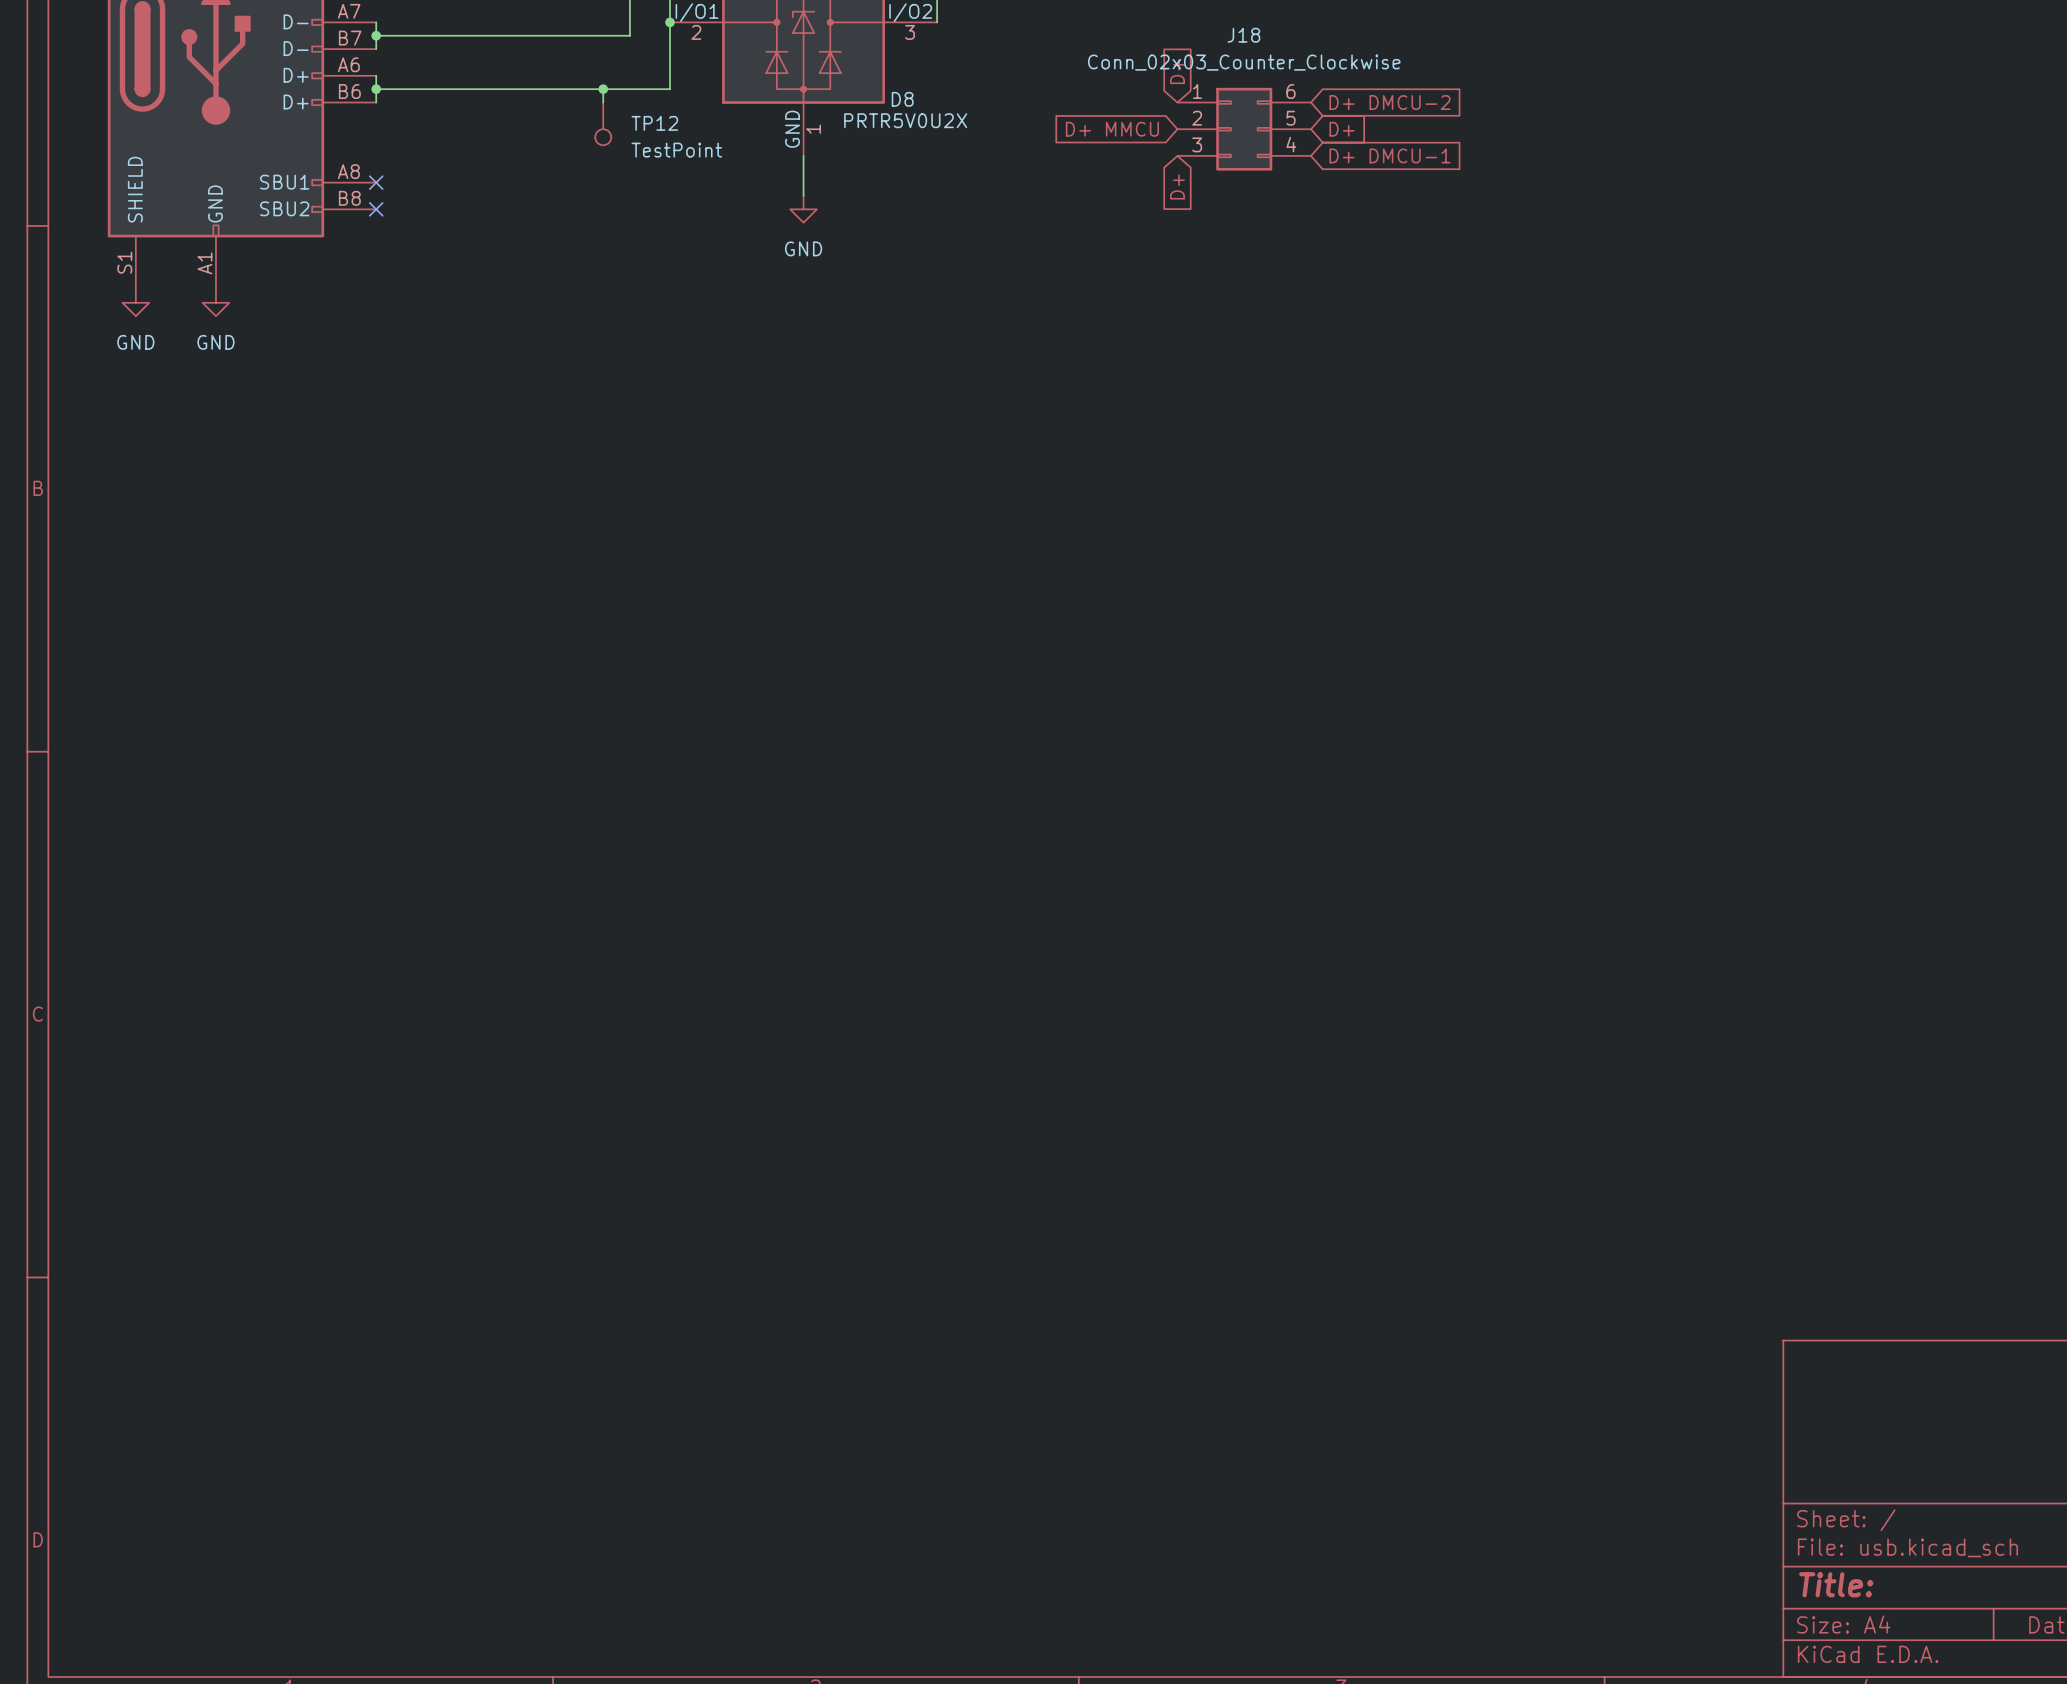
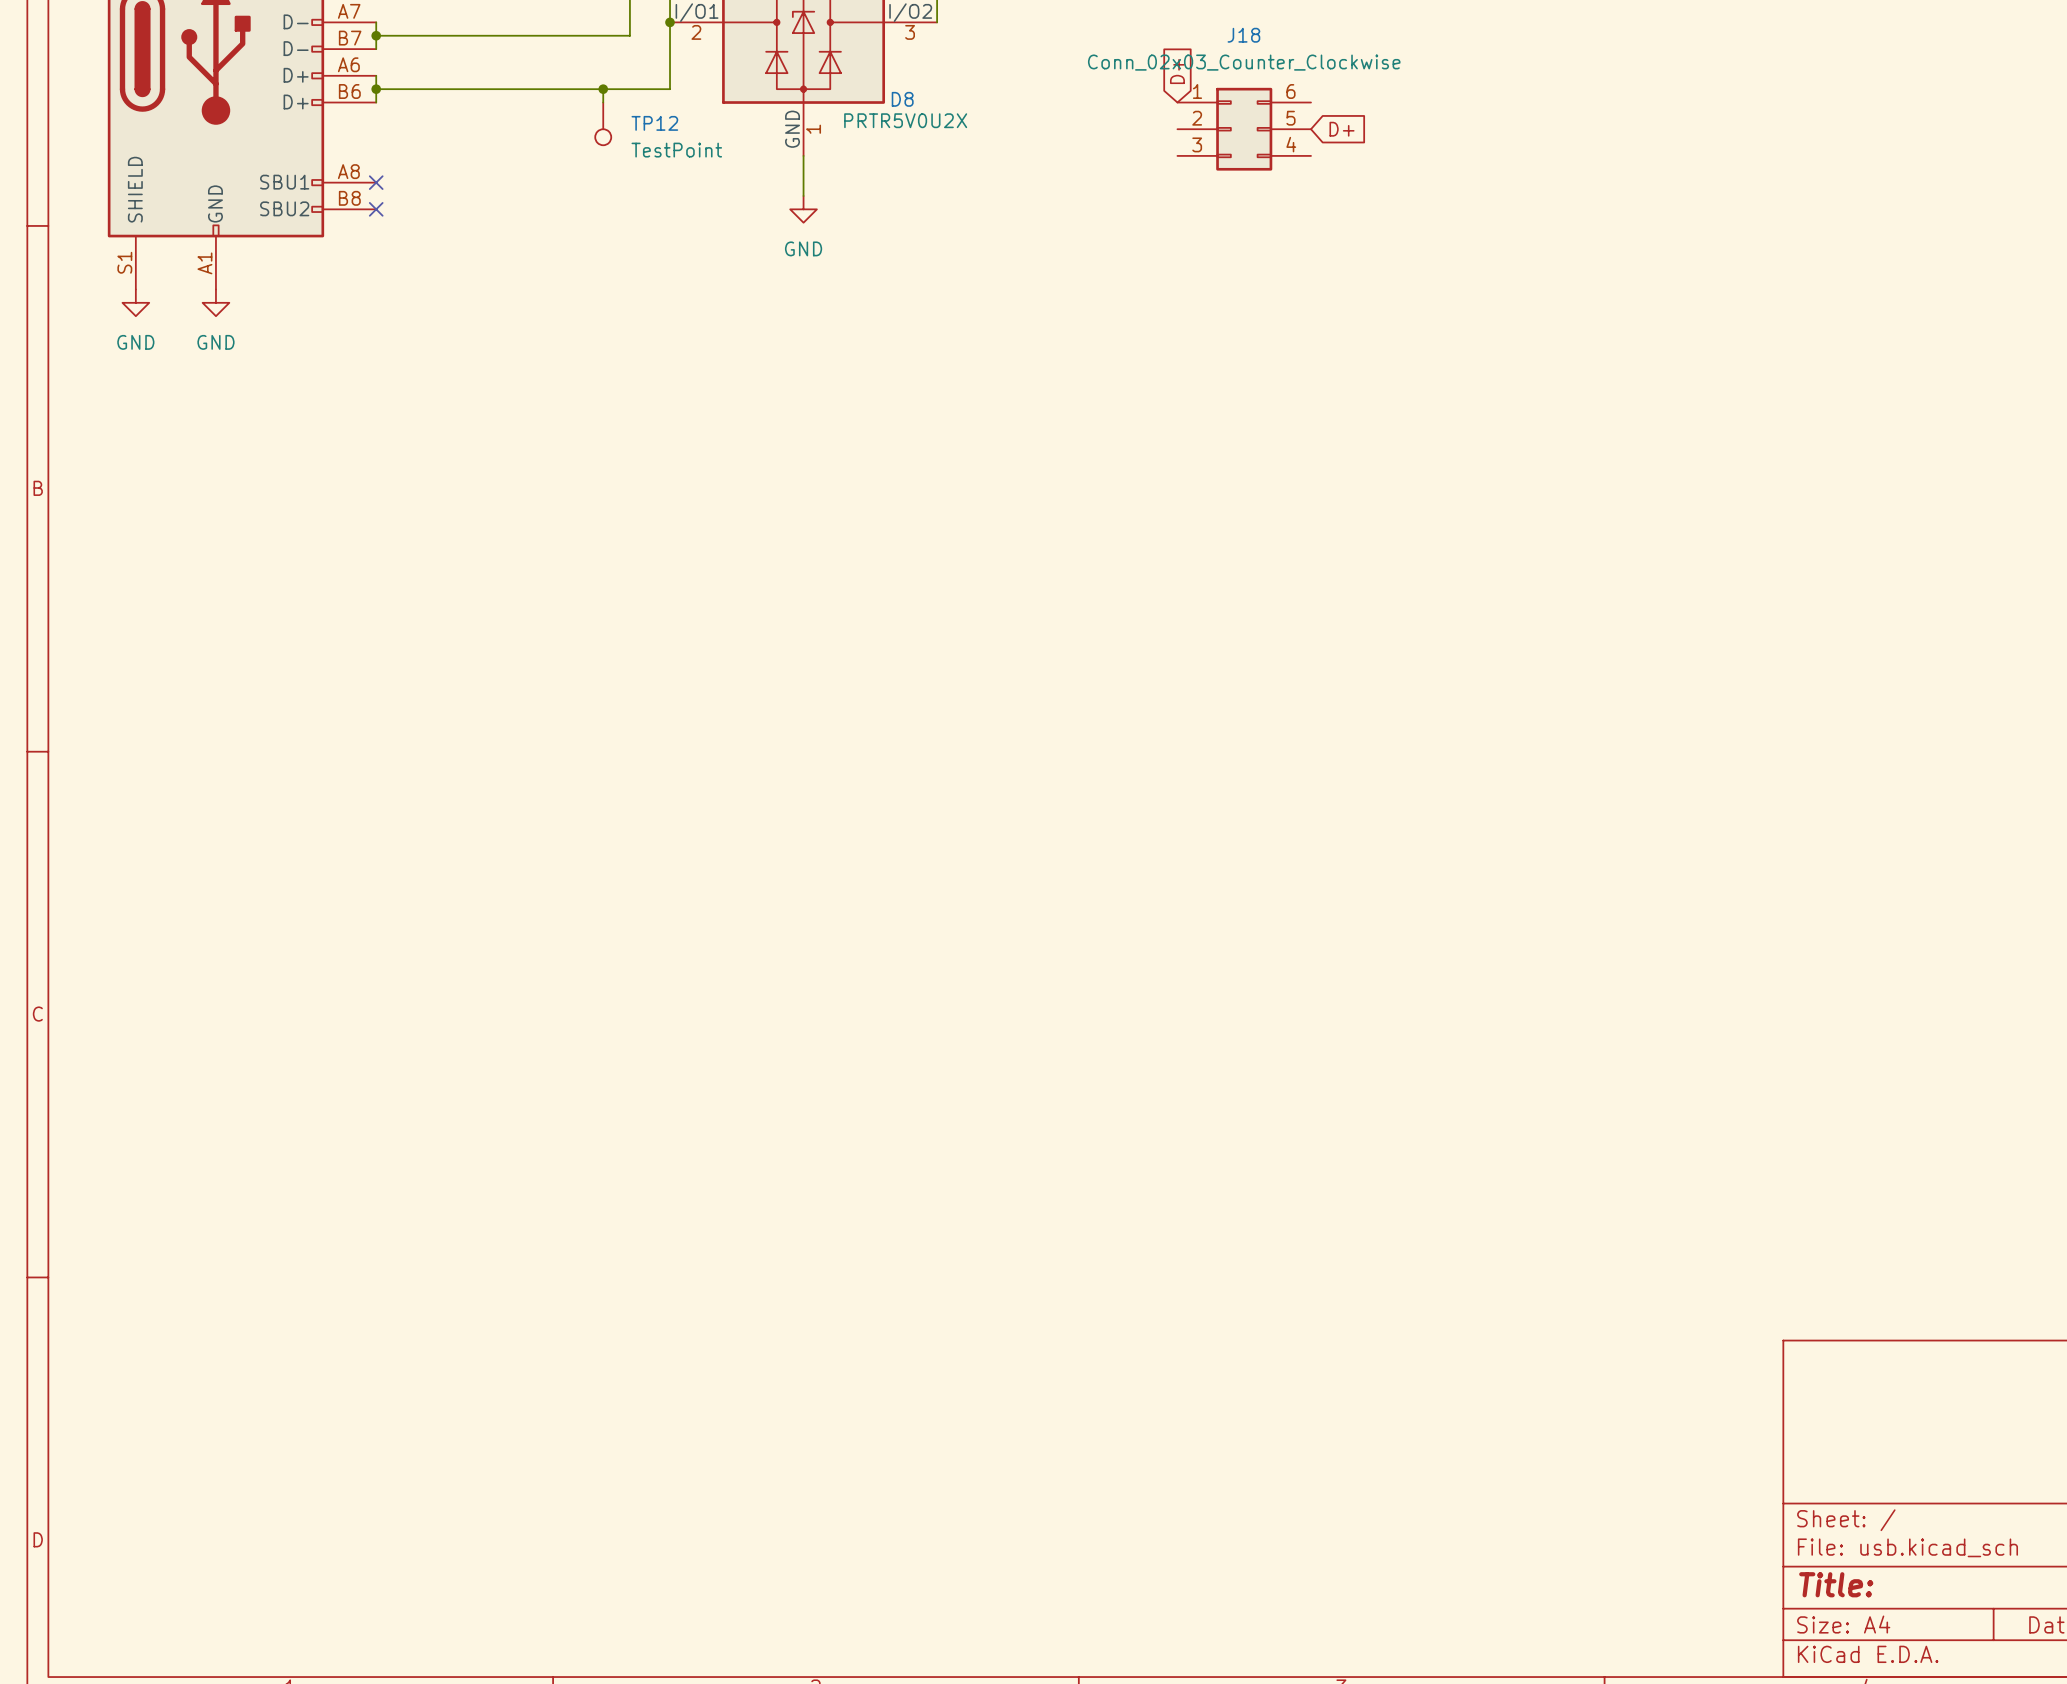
global label: D+ DMCU-2 (1390, 102) -> none
global label: D+ MMCU (1112, 129) -> none
global label: D+ DMCU-1 (1390, 155) -> none
global label: D+ (1177, 186) -> none

